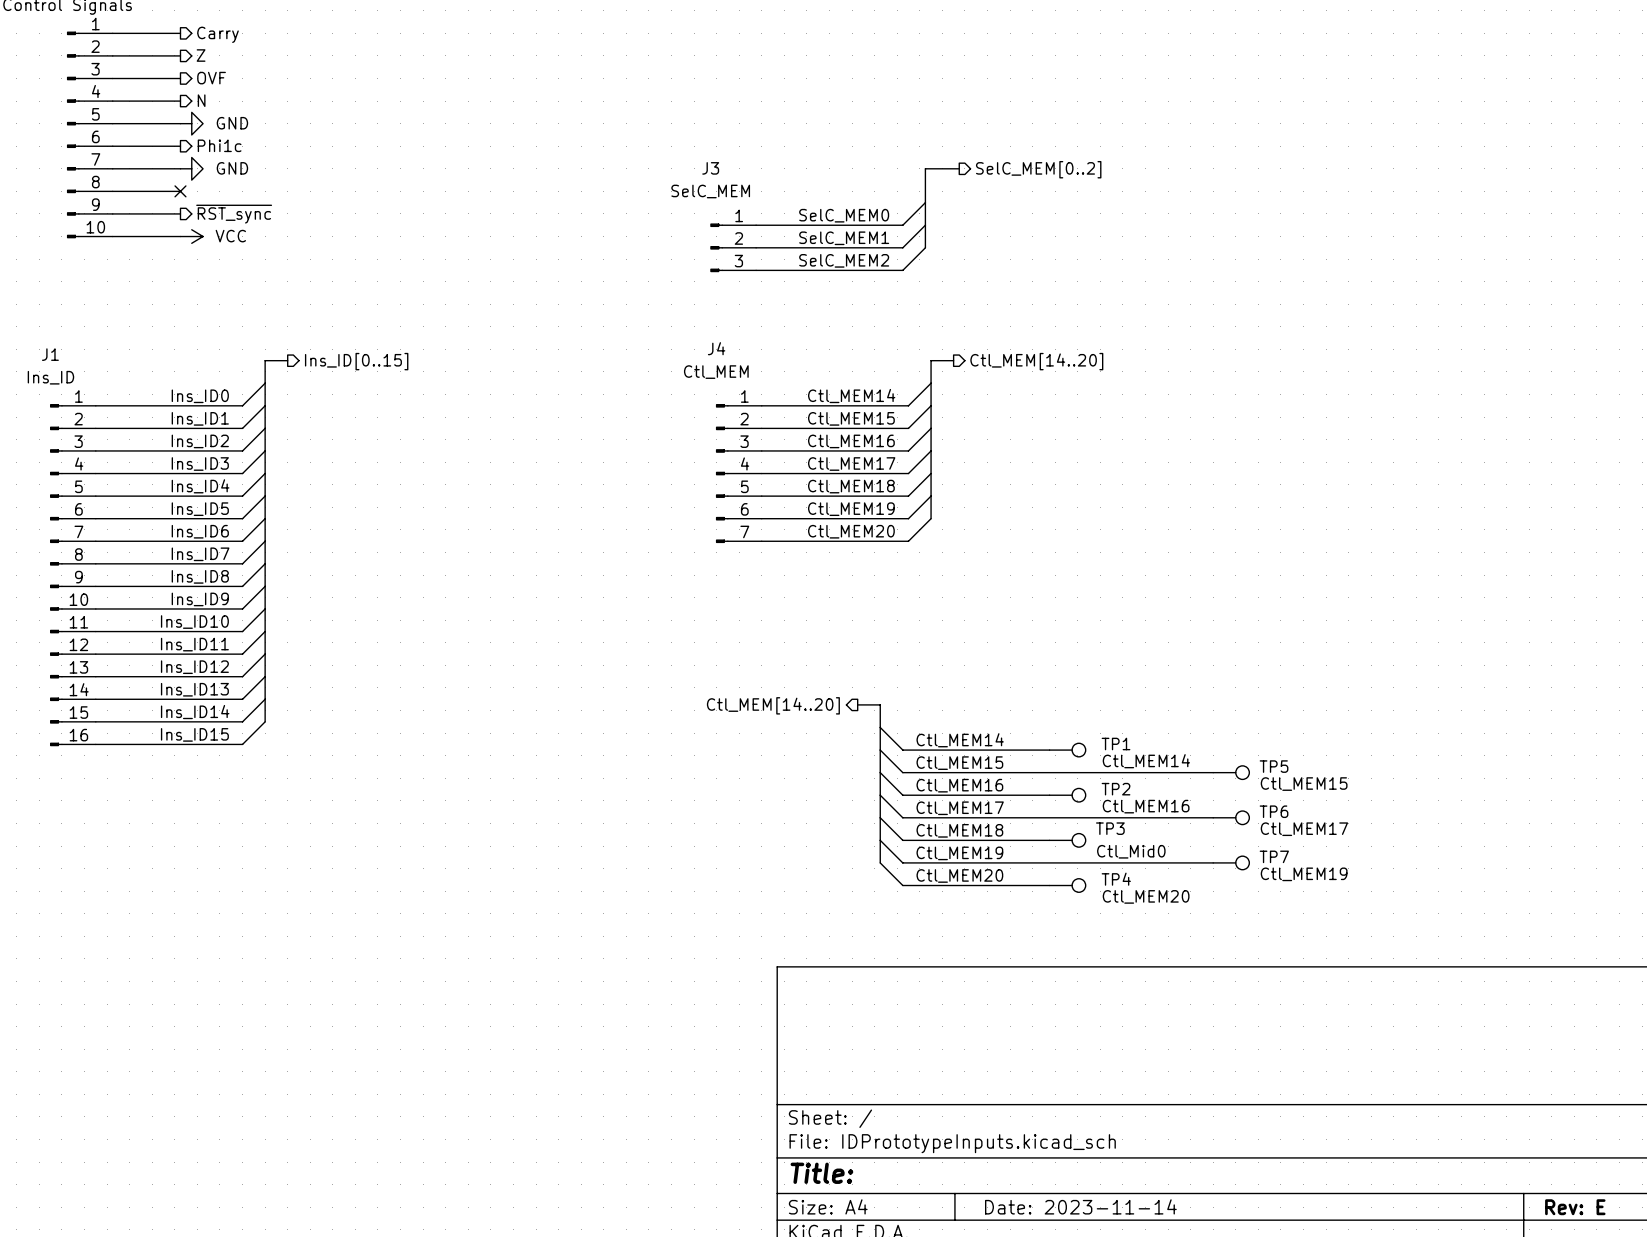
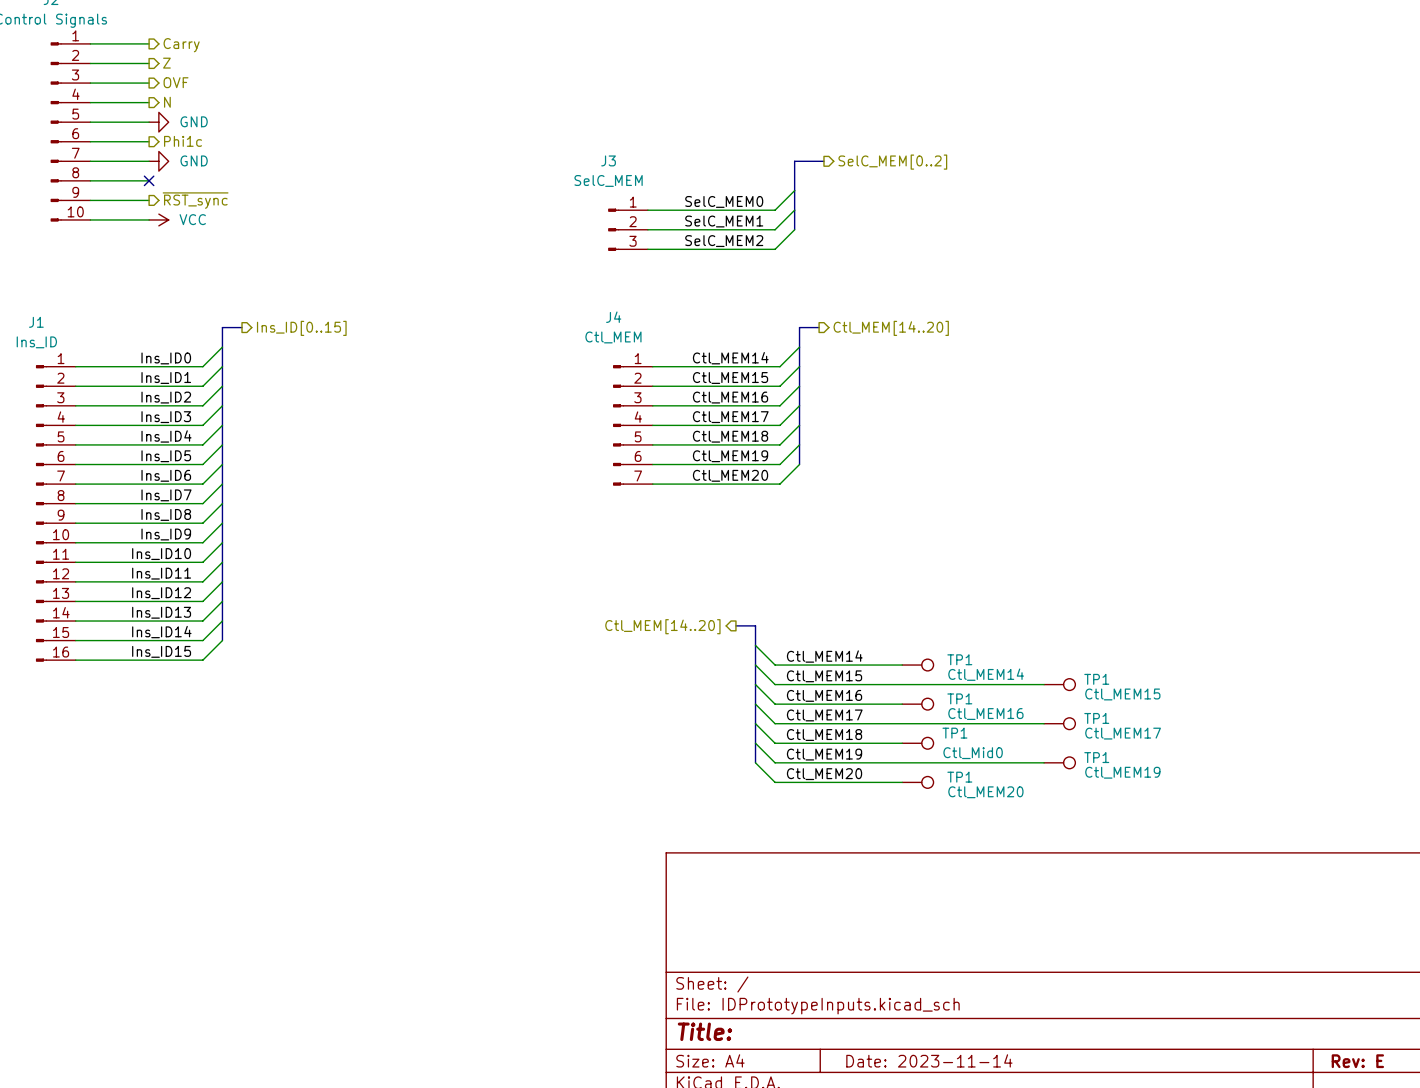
TP5 name: TP5 (1274, 766) -> TP1 (1096, 679)
TP2 name: TP2 (1116, 789) -> TP1 (959, 698)
TP6 name: TP6 (1274, 811) -> TP1 (1096, 718)
TP3 name: TP3 (1110, 828) -> TP1 (954, 733)
TP7 name: TP7 (1274, 856) -> TP1 (1096, 757)
TP4 name: TP4 (1116, 879) -> TP1 (959, 777)

